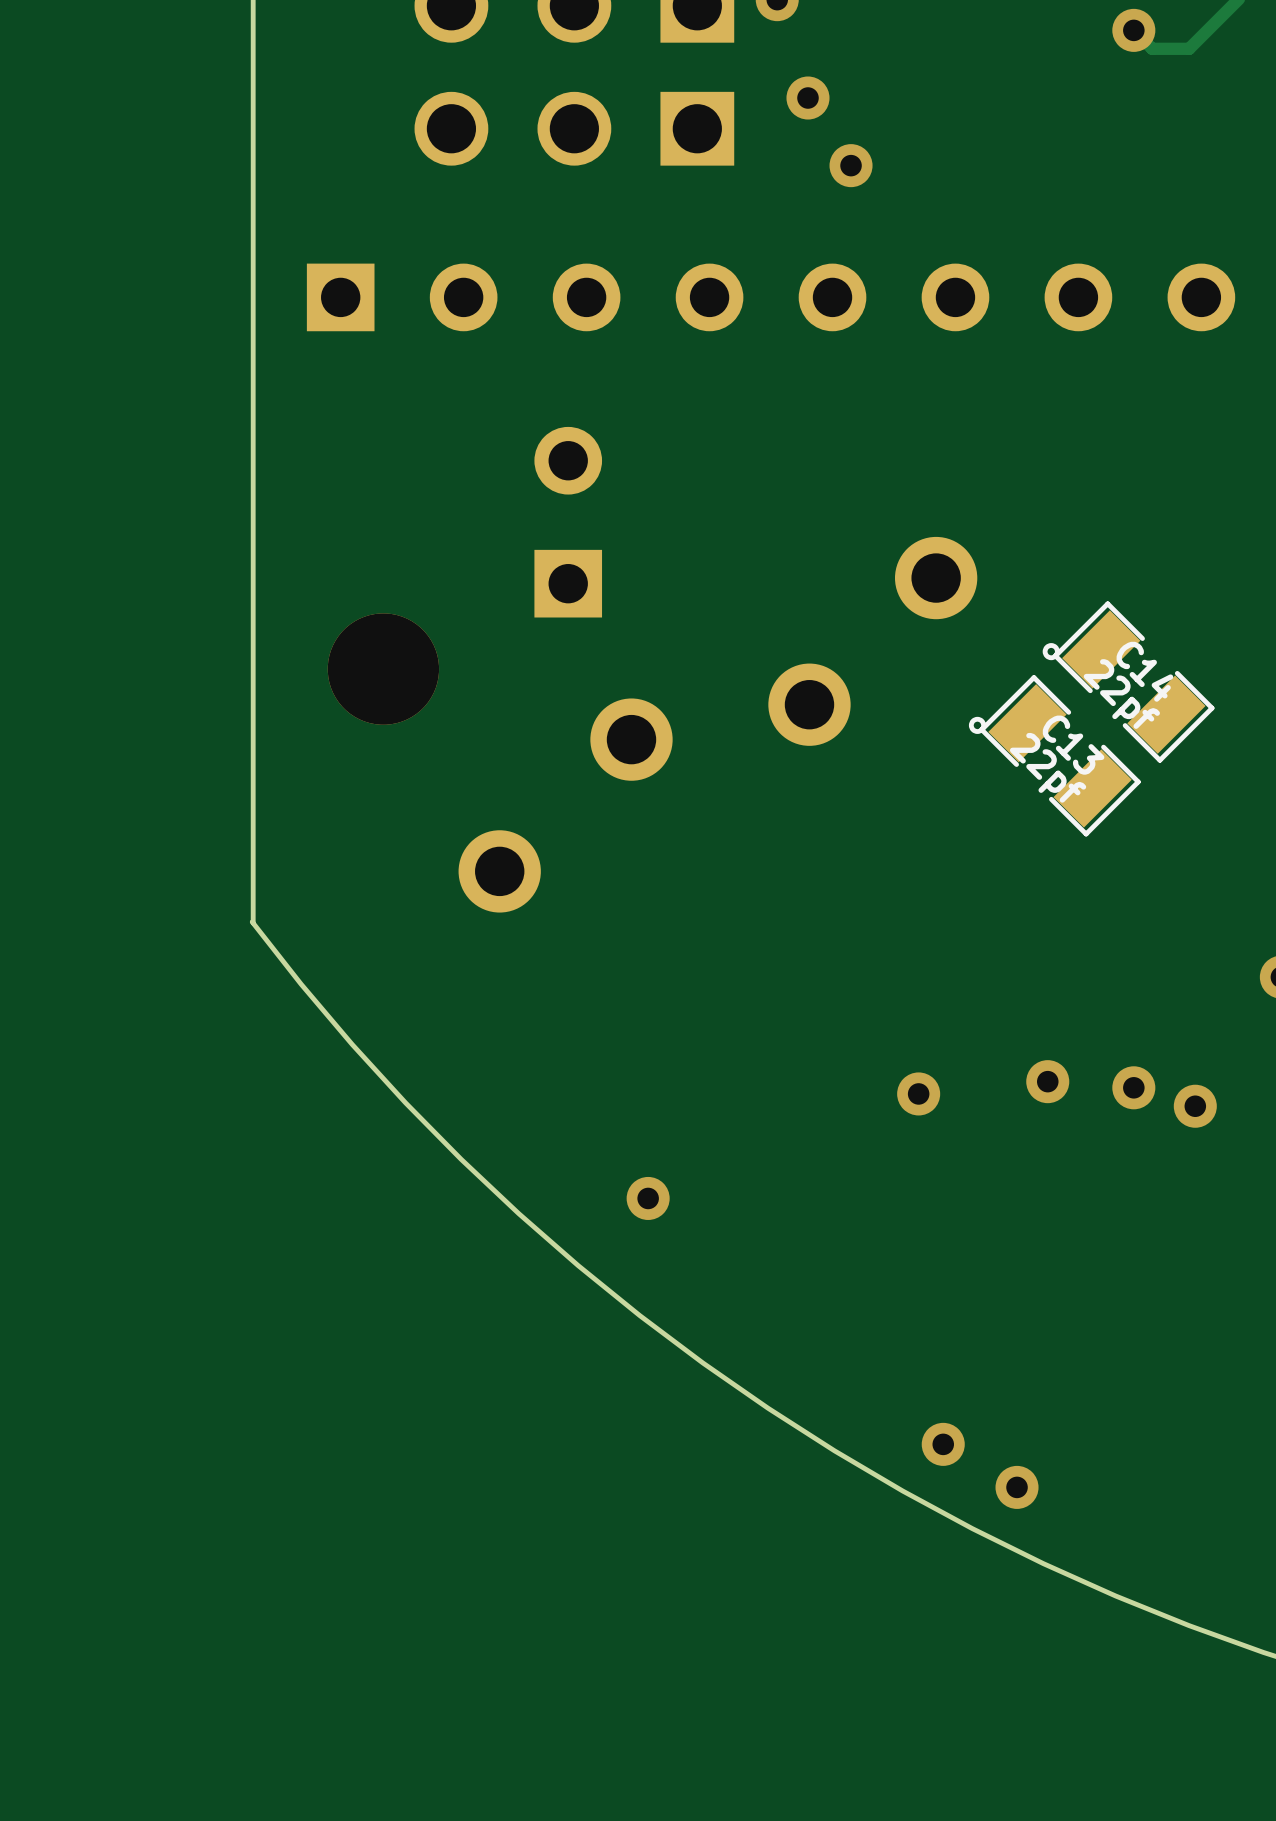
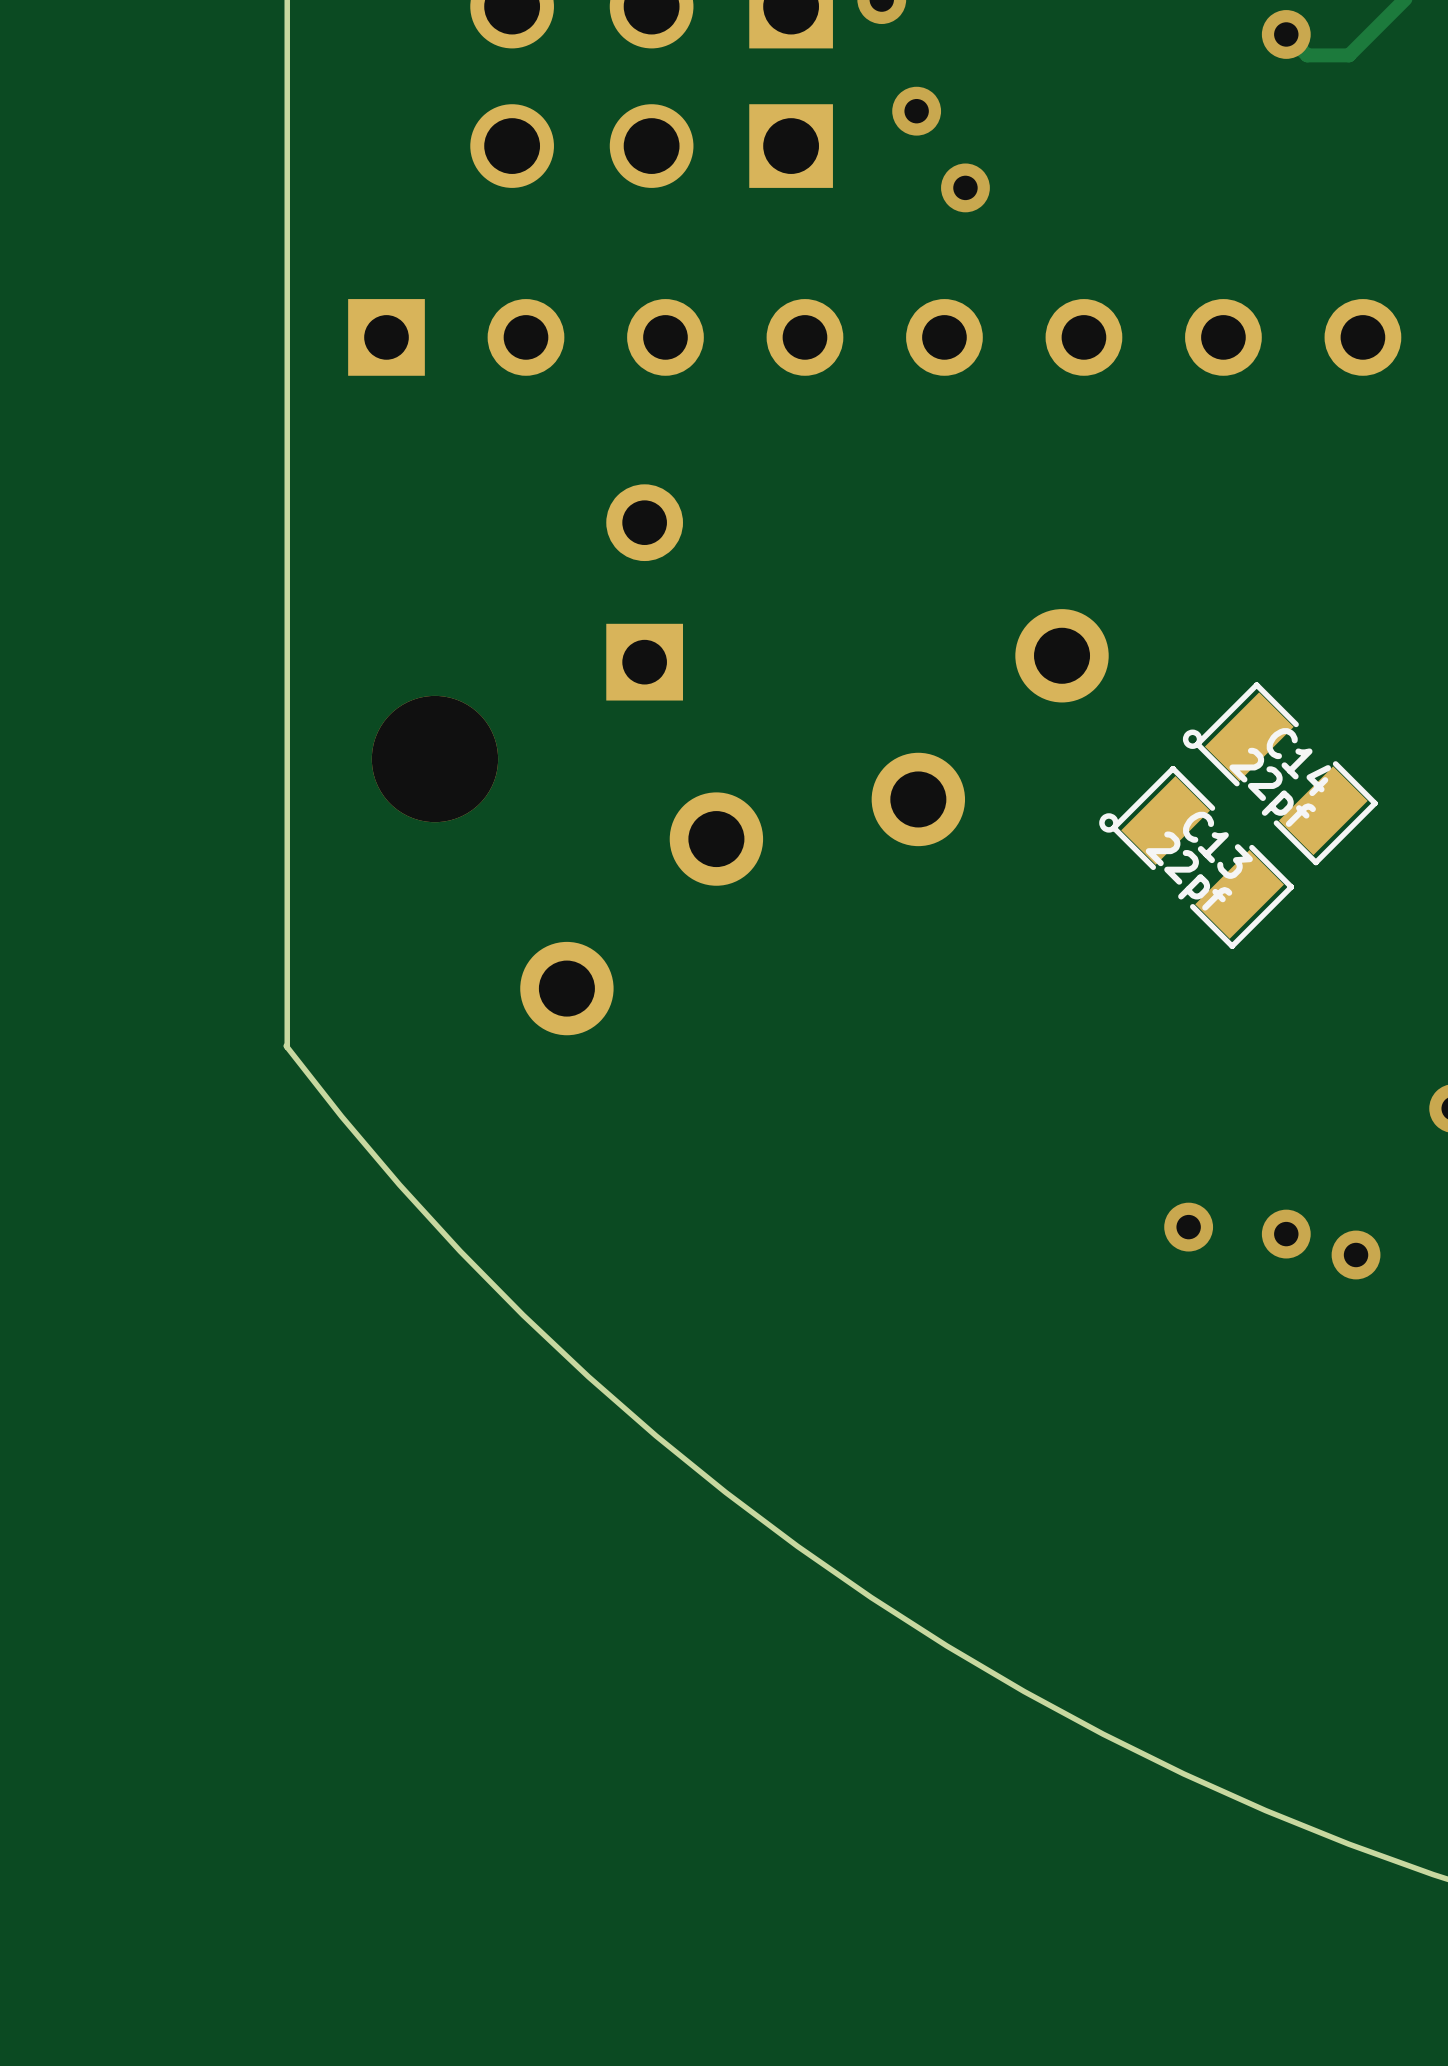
via: (918, 1093) -> none
via: (648, 1198) -> none
via: (943, 1444) -> none
via: (1017, 1487) -> none

